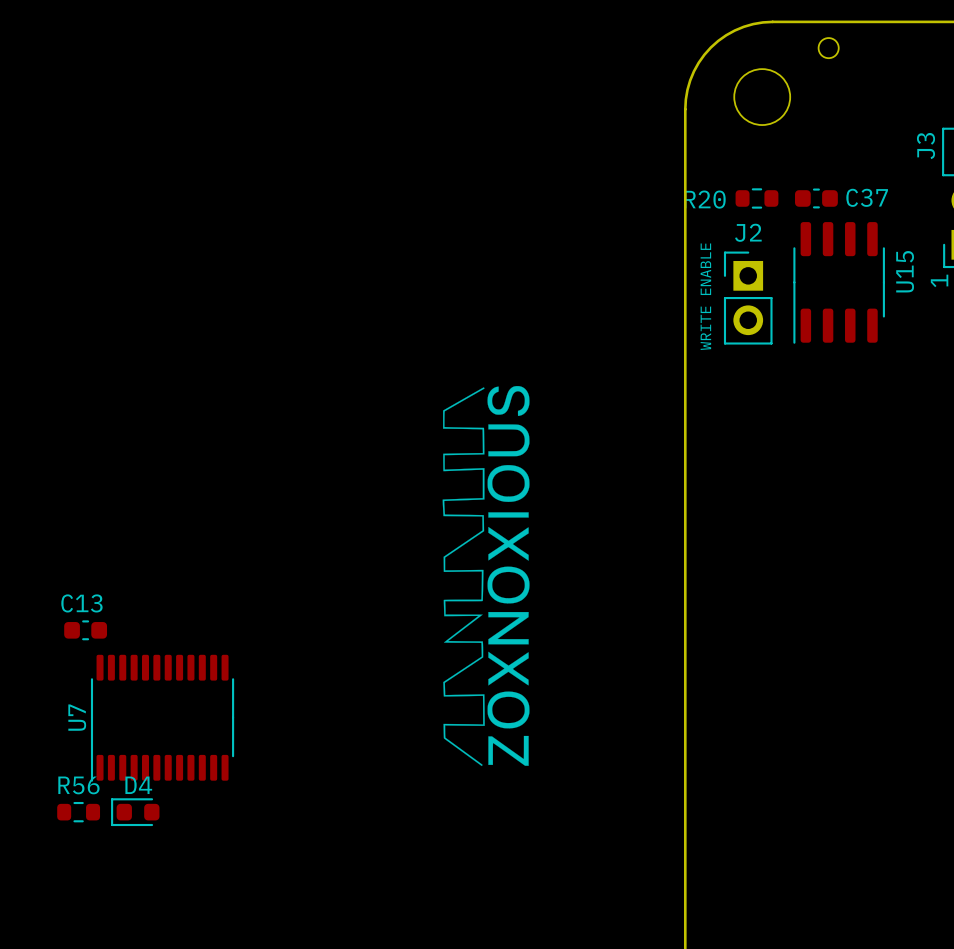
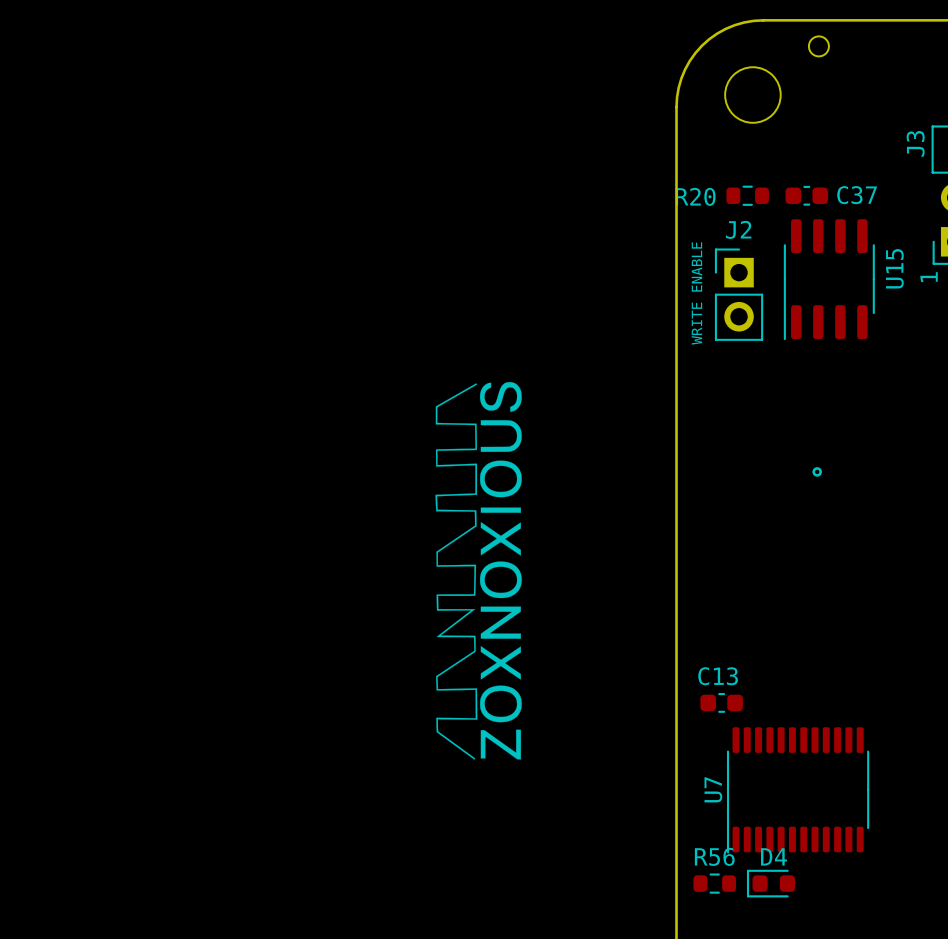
drawing: none -> [812, 467, 822, 477]
C13 position: (85, 630) -> (721, 702)
U7 position: (162, 718) -> (798, 790)
R56 position: (78, 812) -> (714, 883)
D4 position: (135, 812) -> (770, 883)

